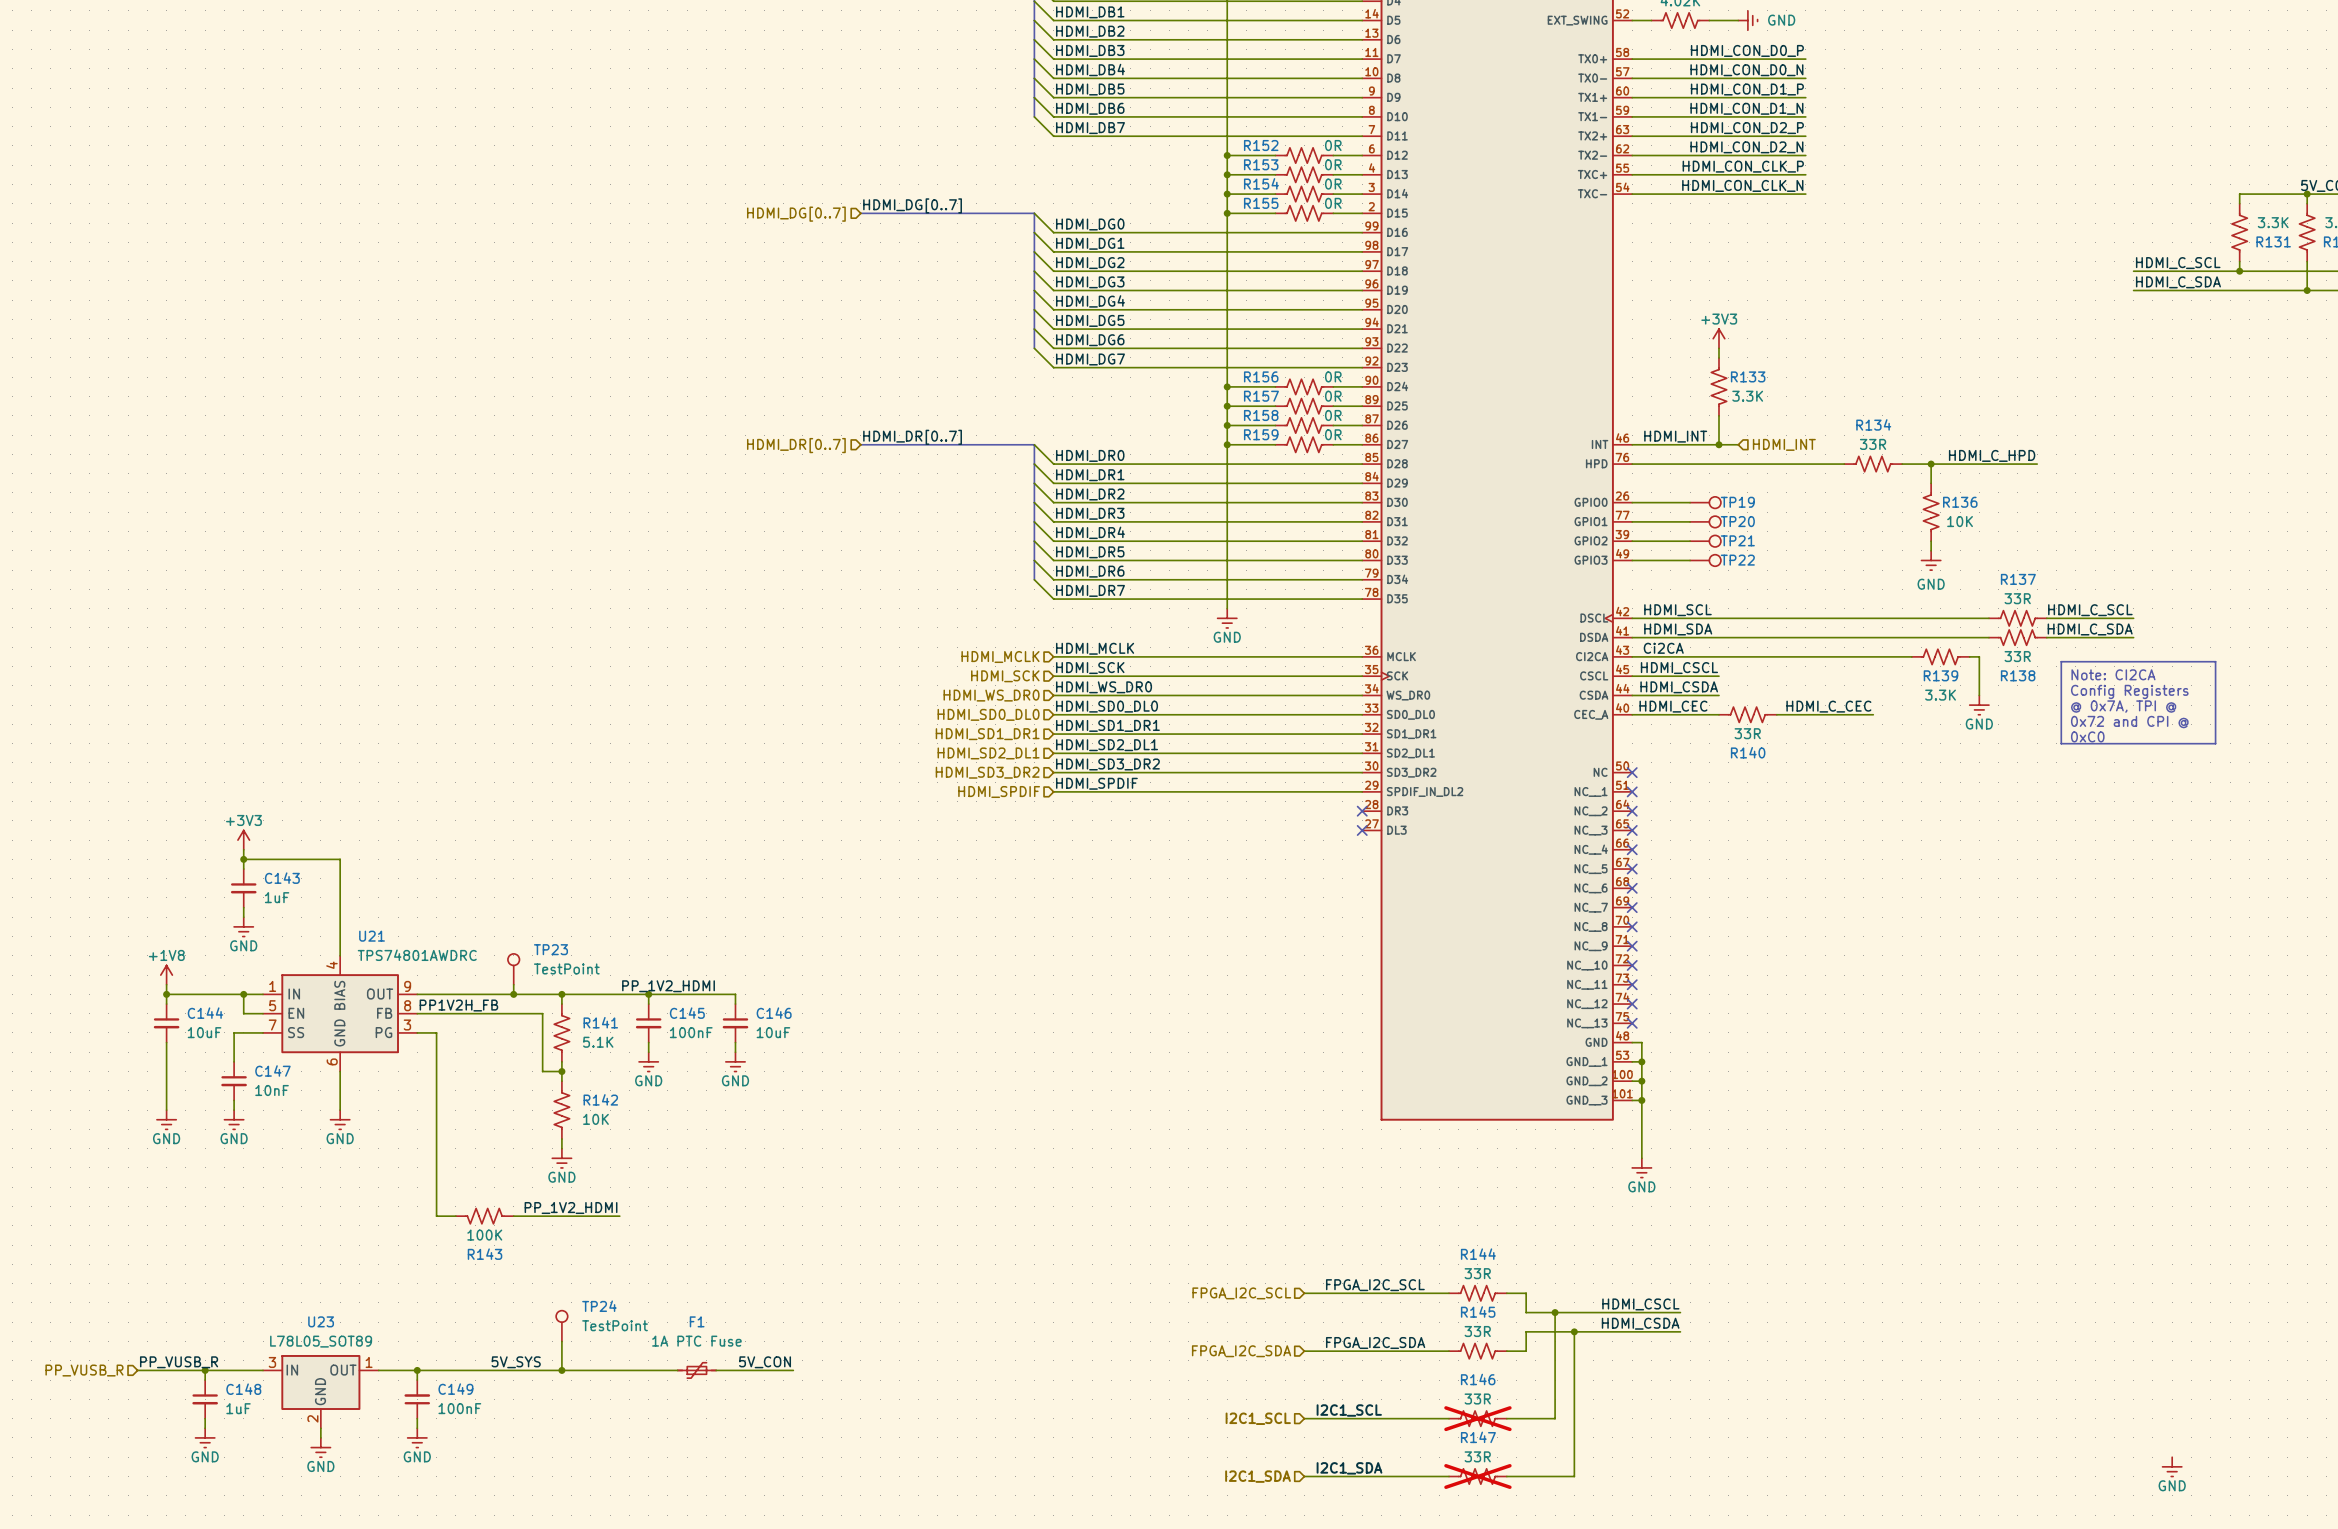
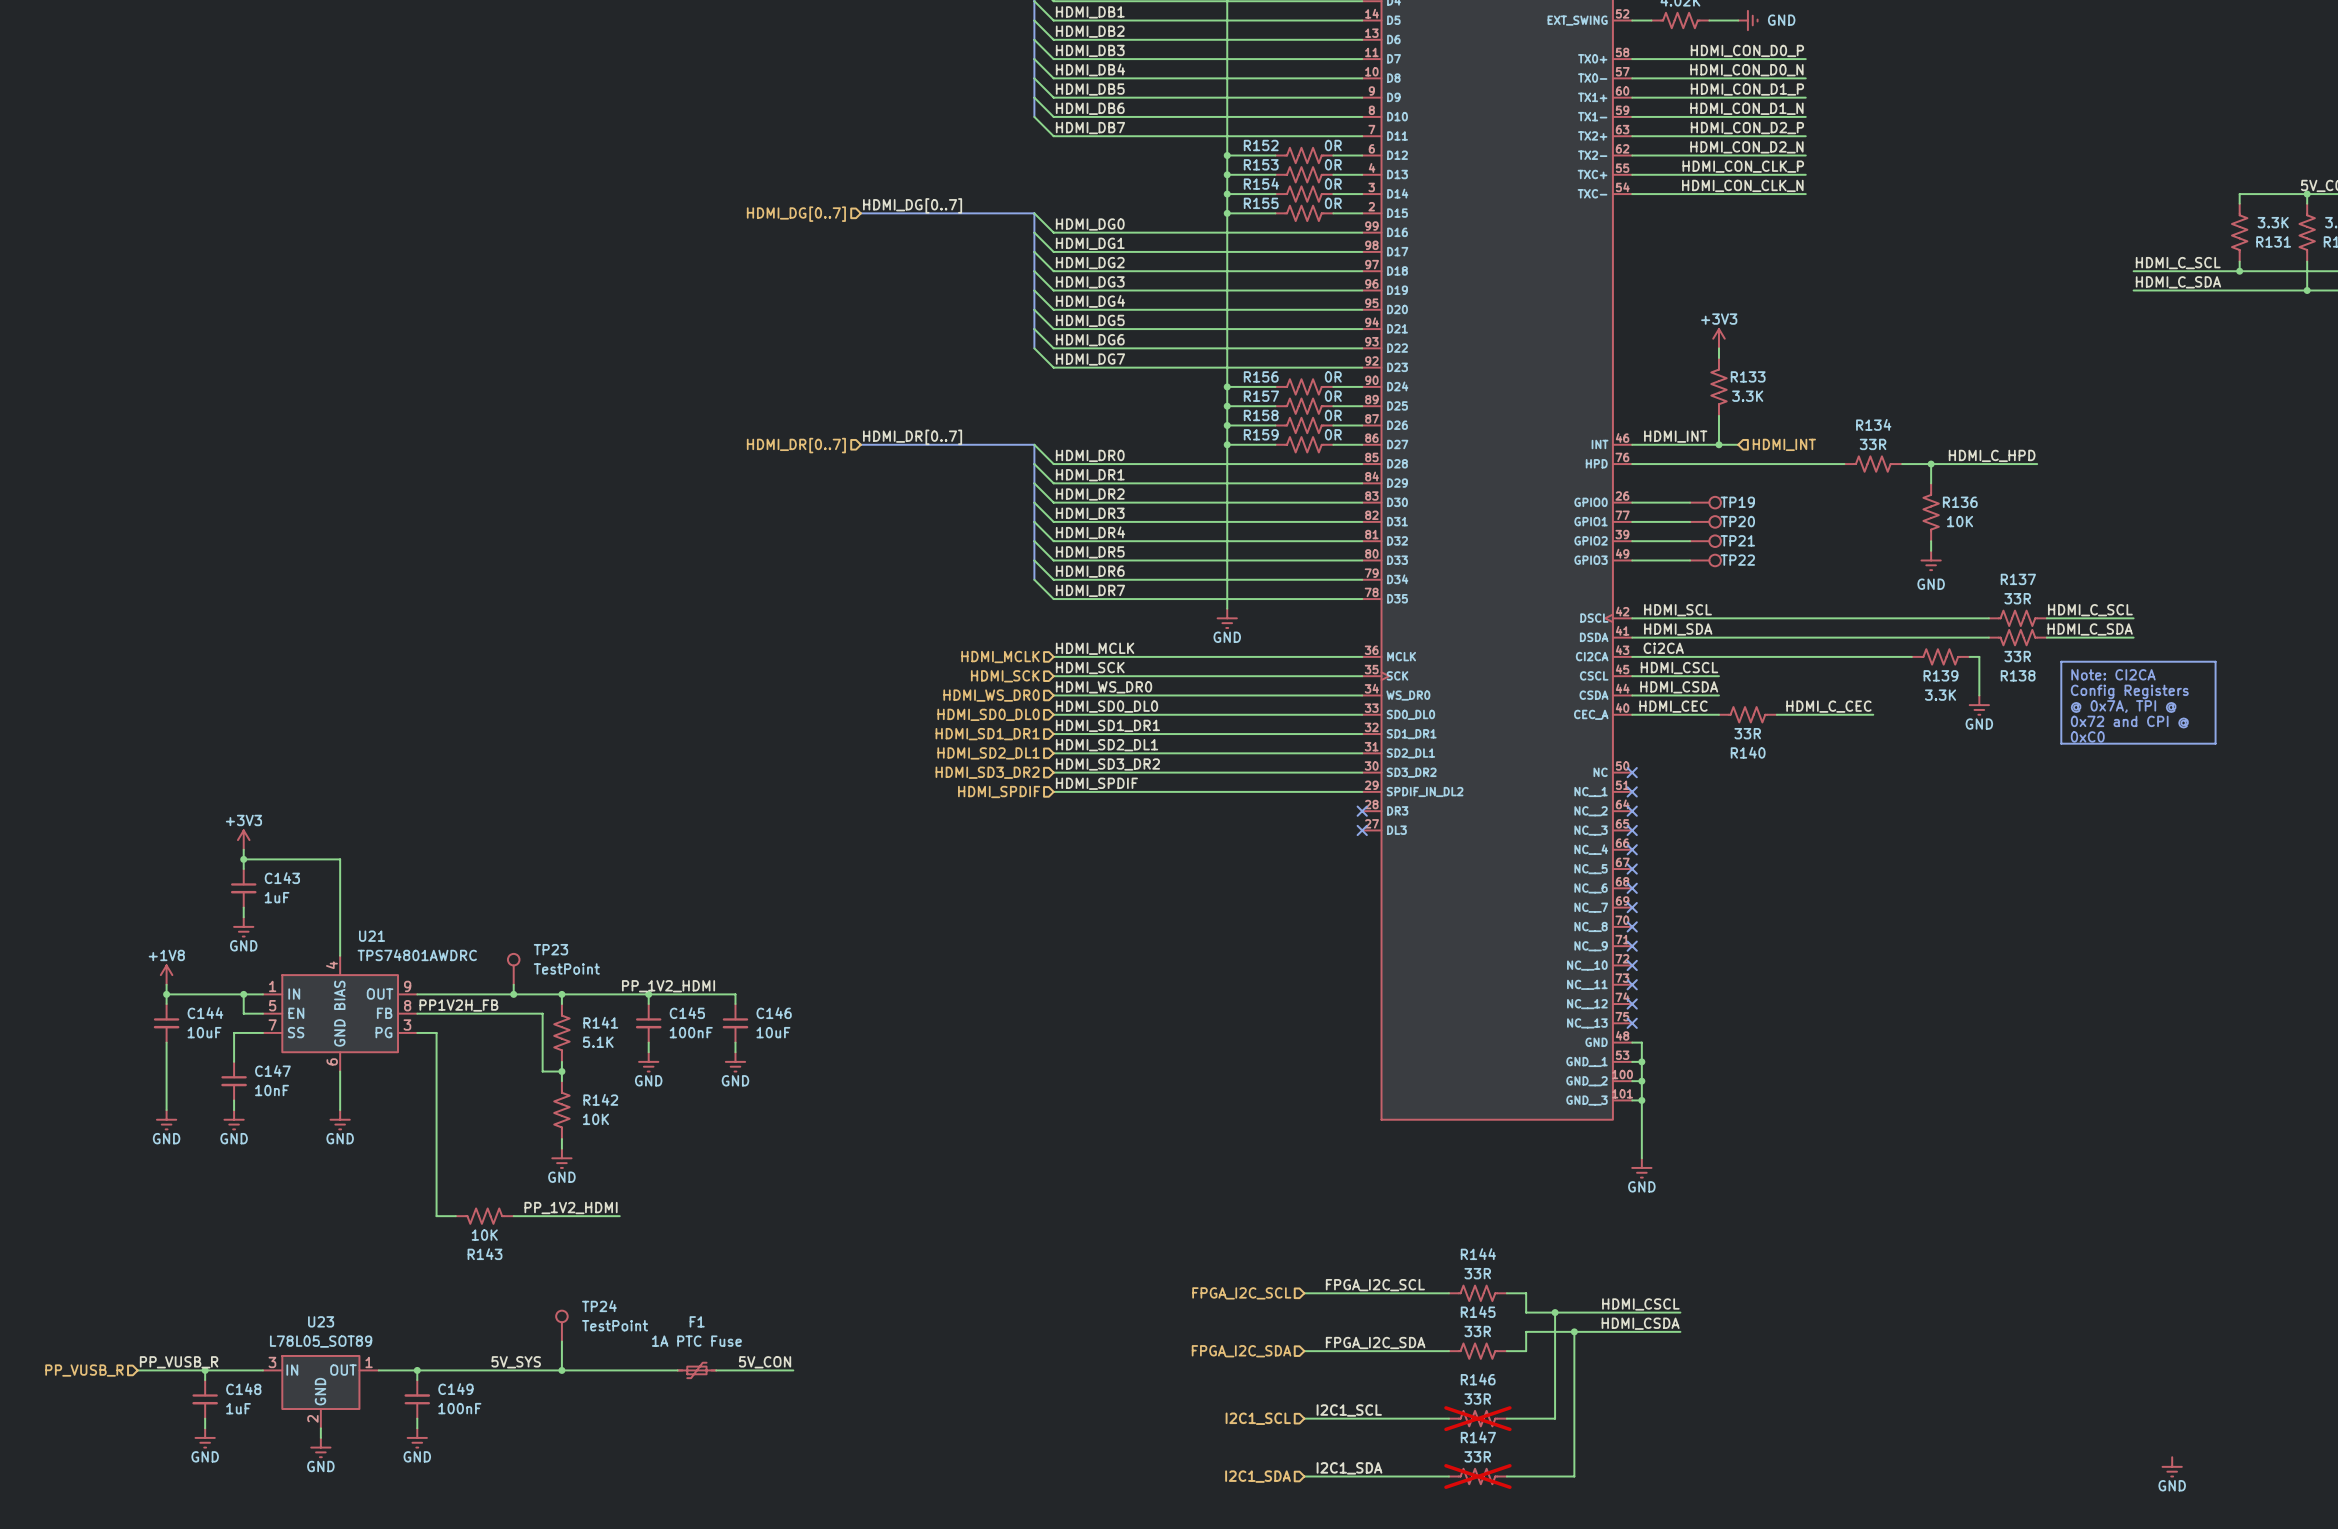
R143 value: 100K (484, 1235) -> 10K (484, 1235)

